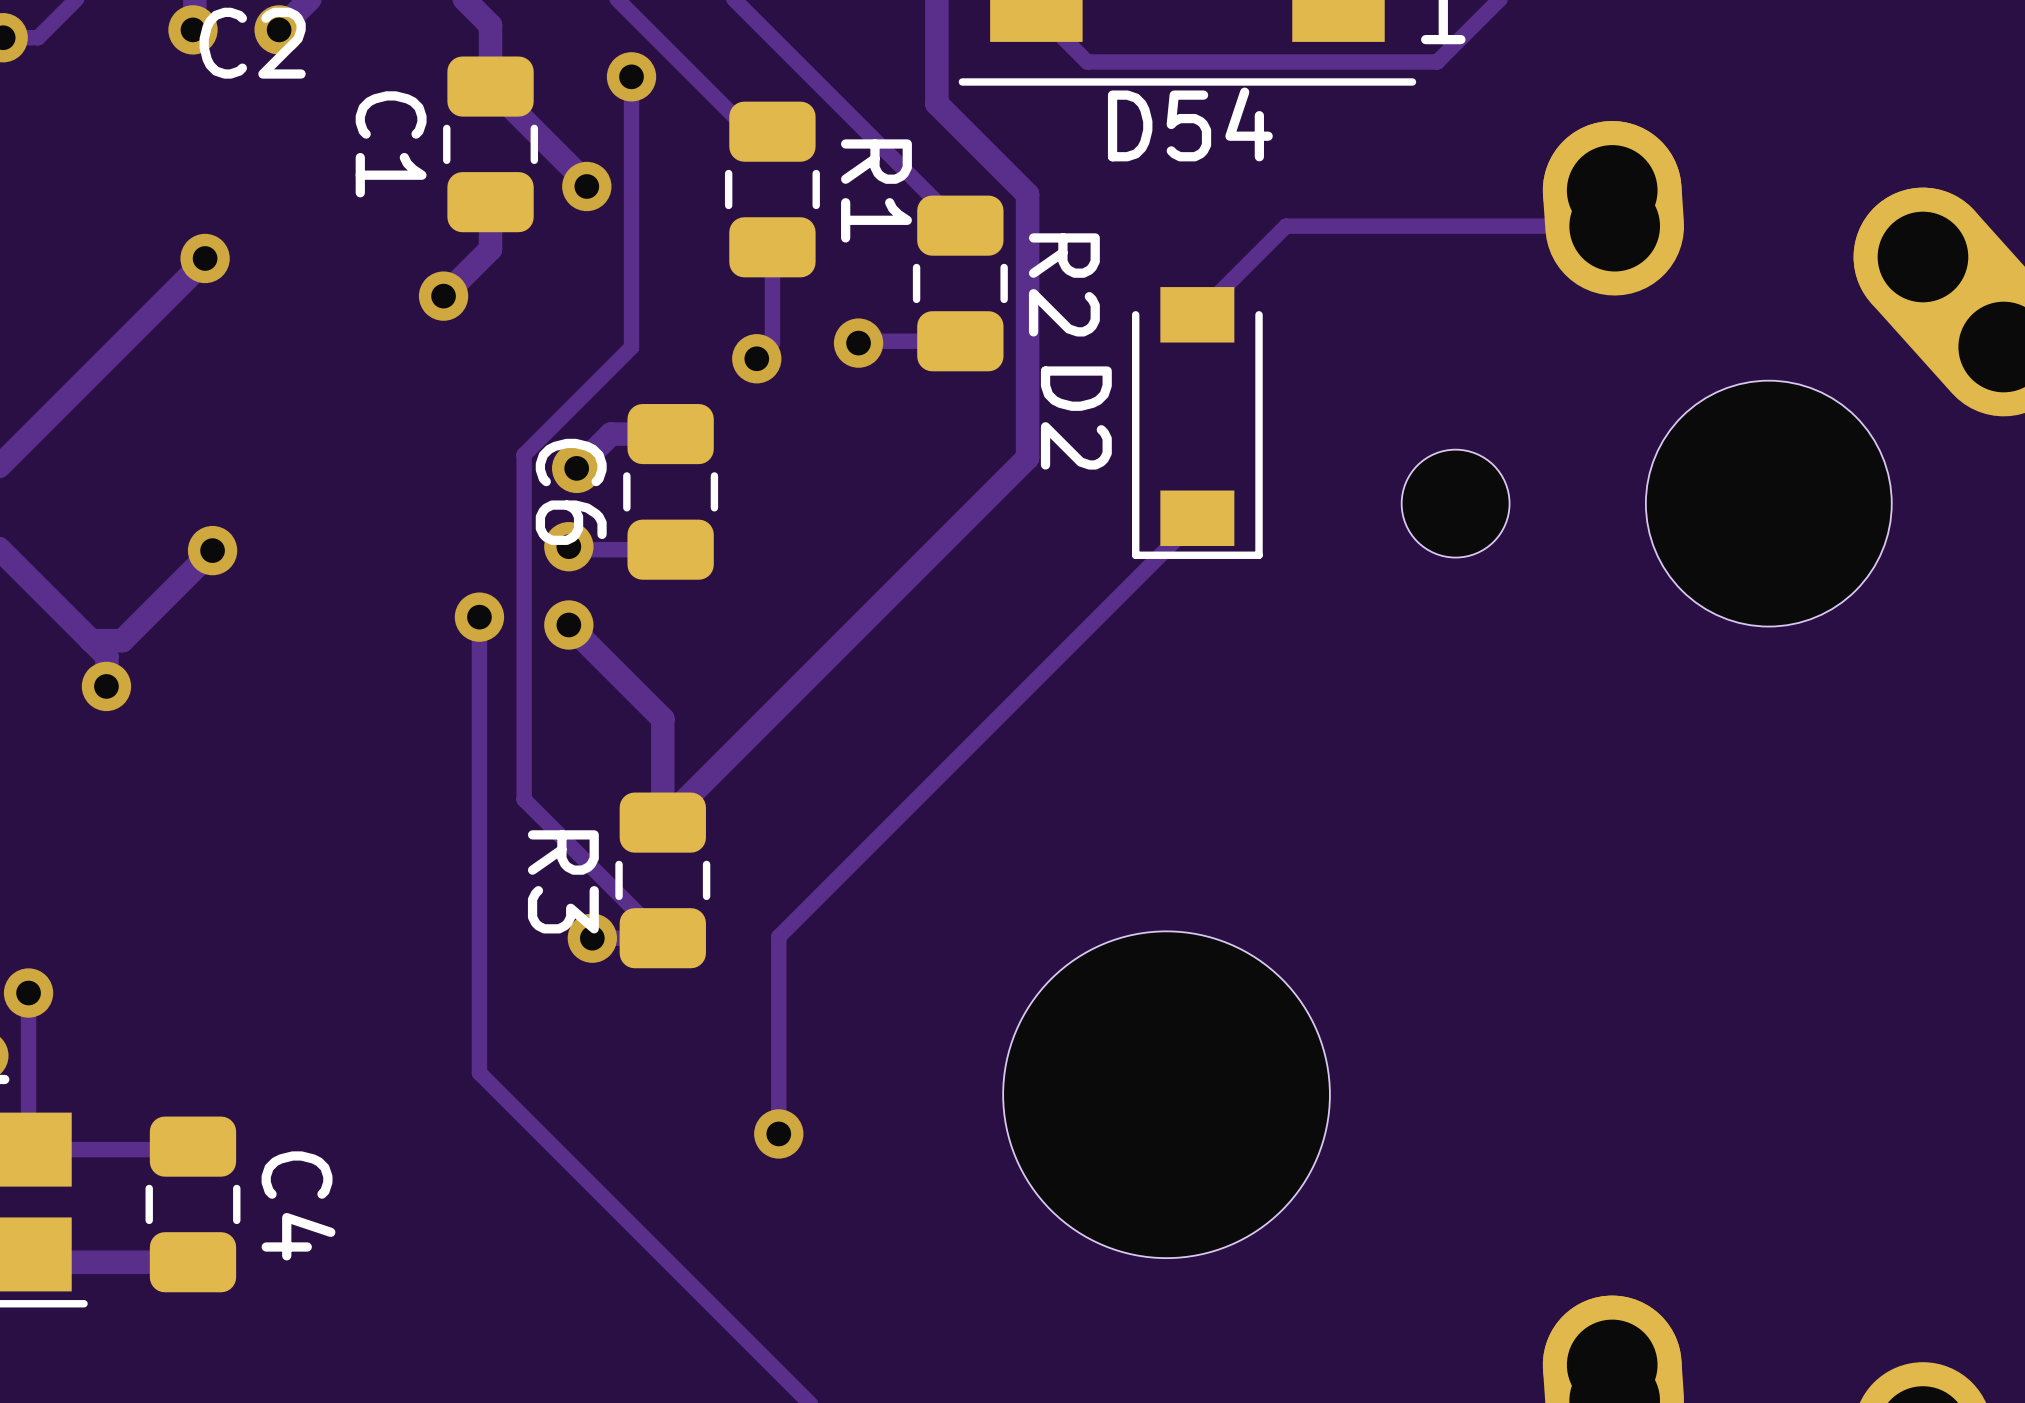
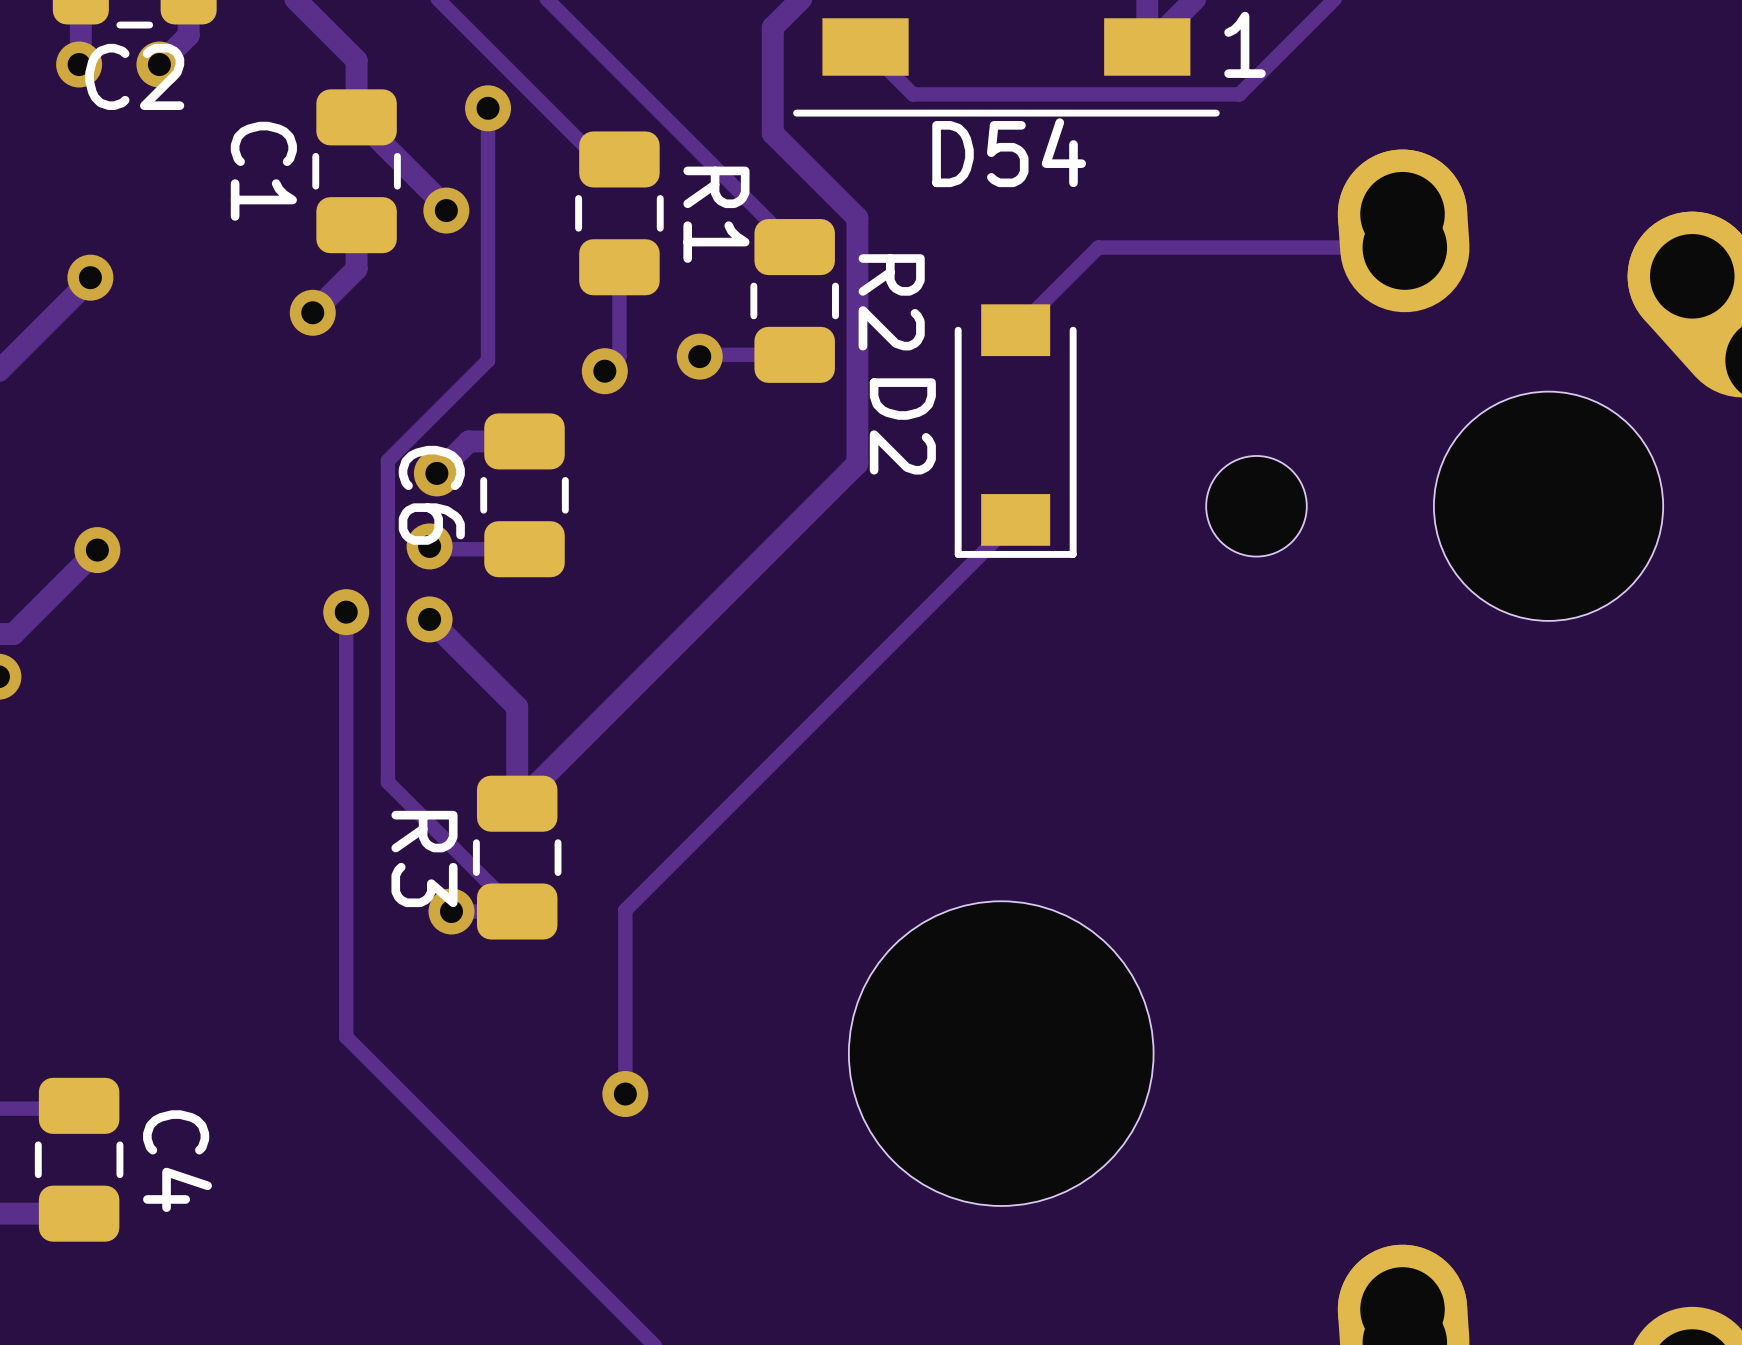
part position: (1166, 1094) -> (1001, 1053)

